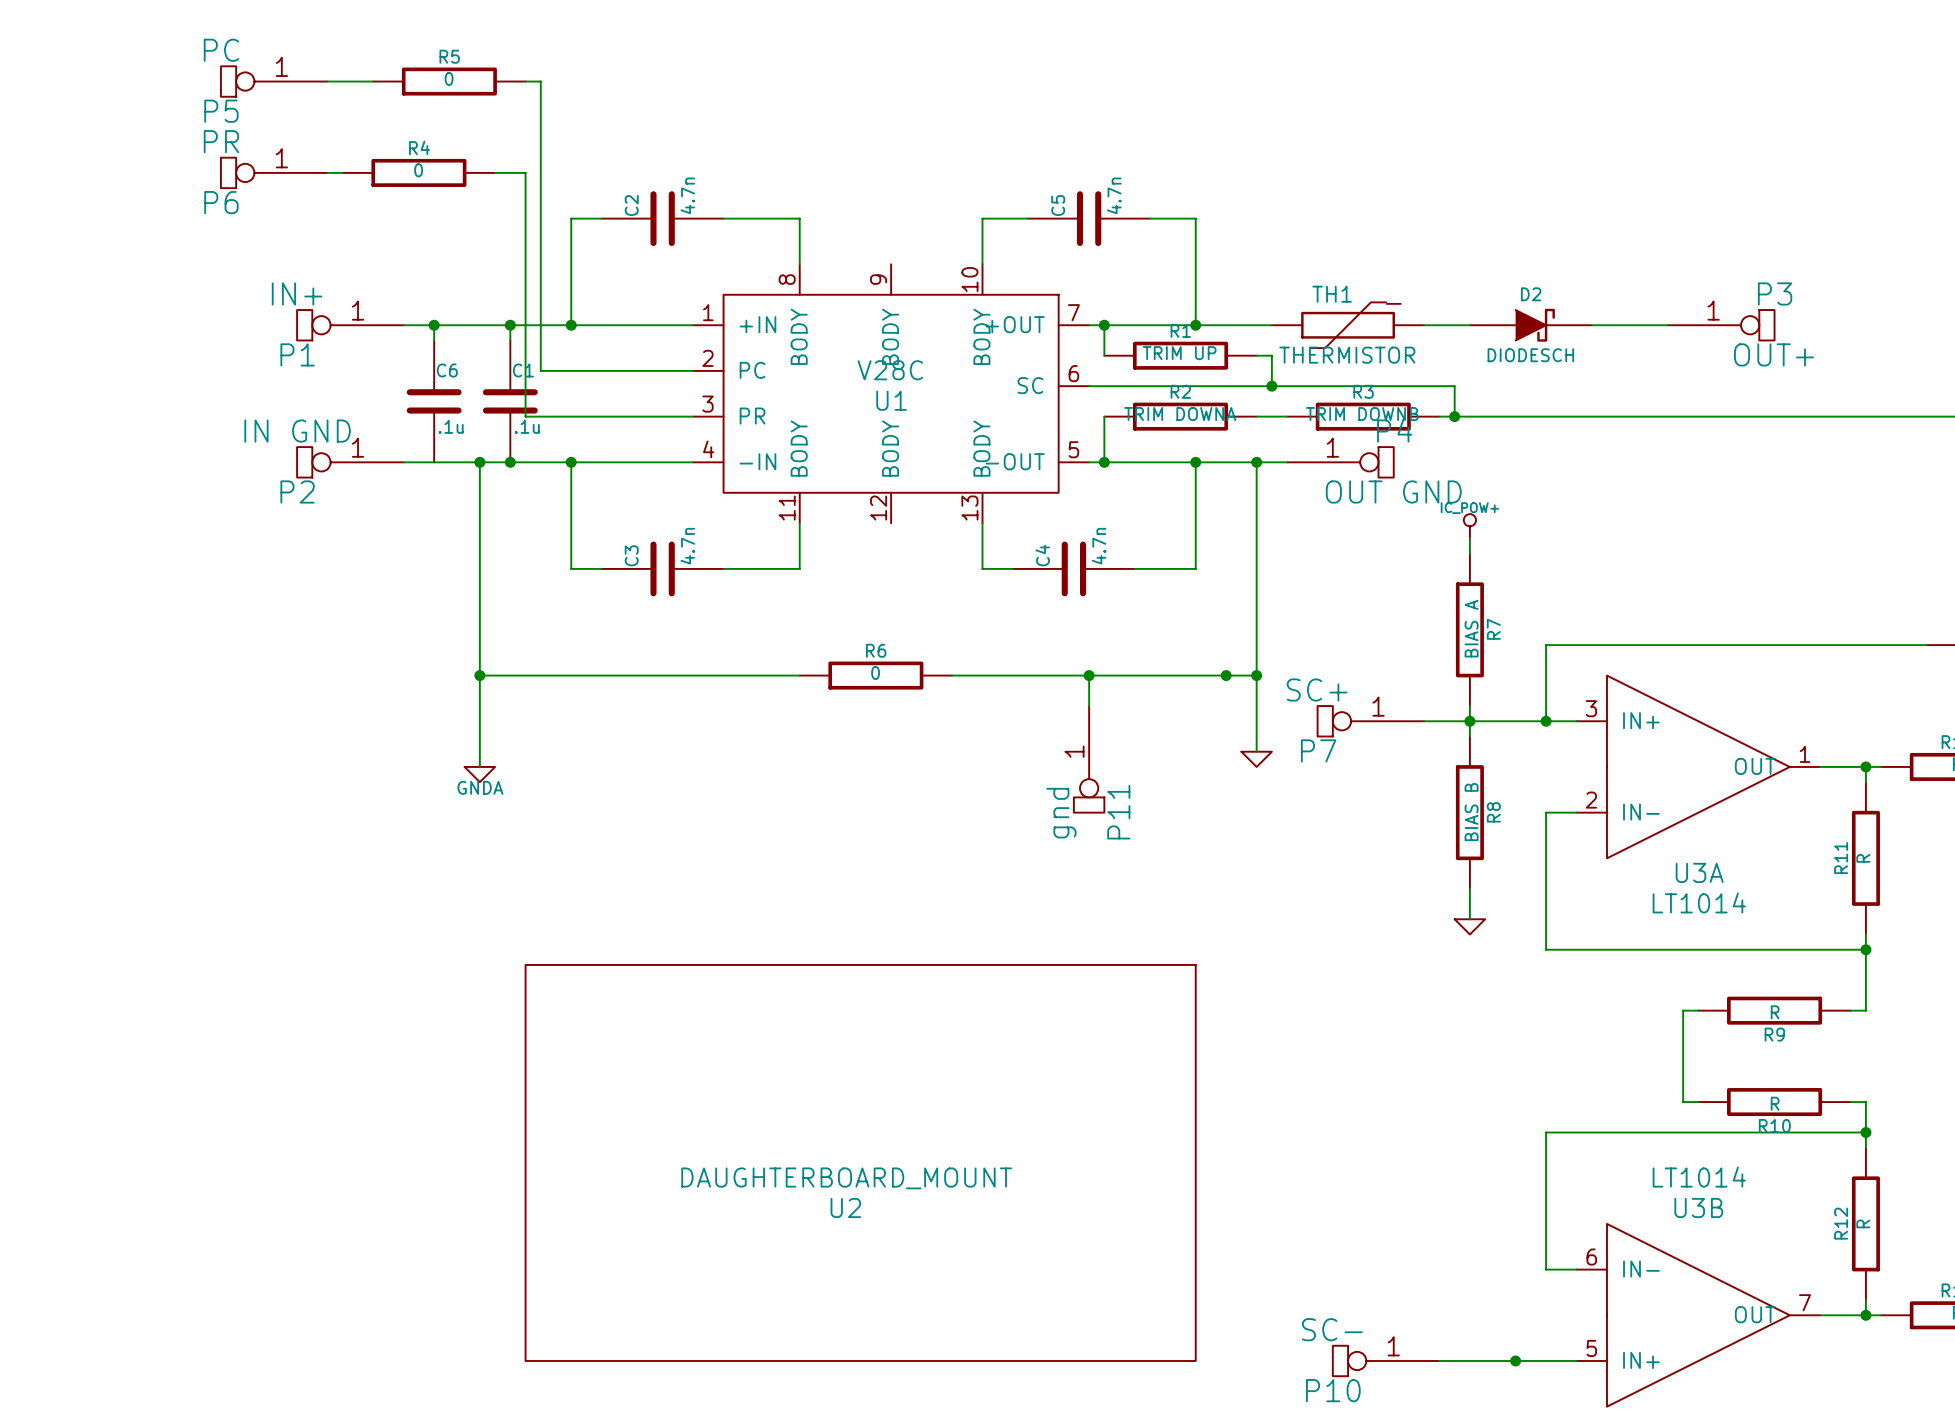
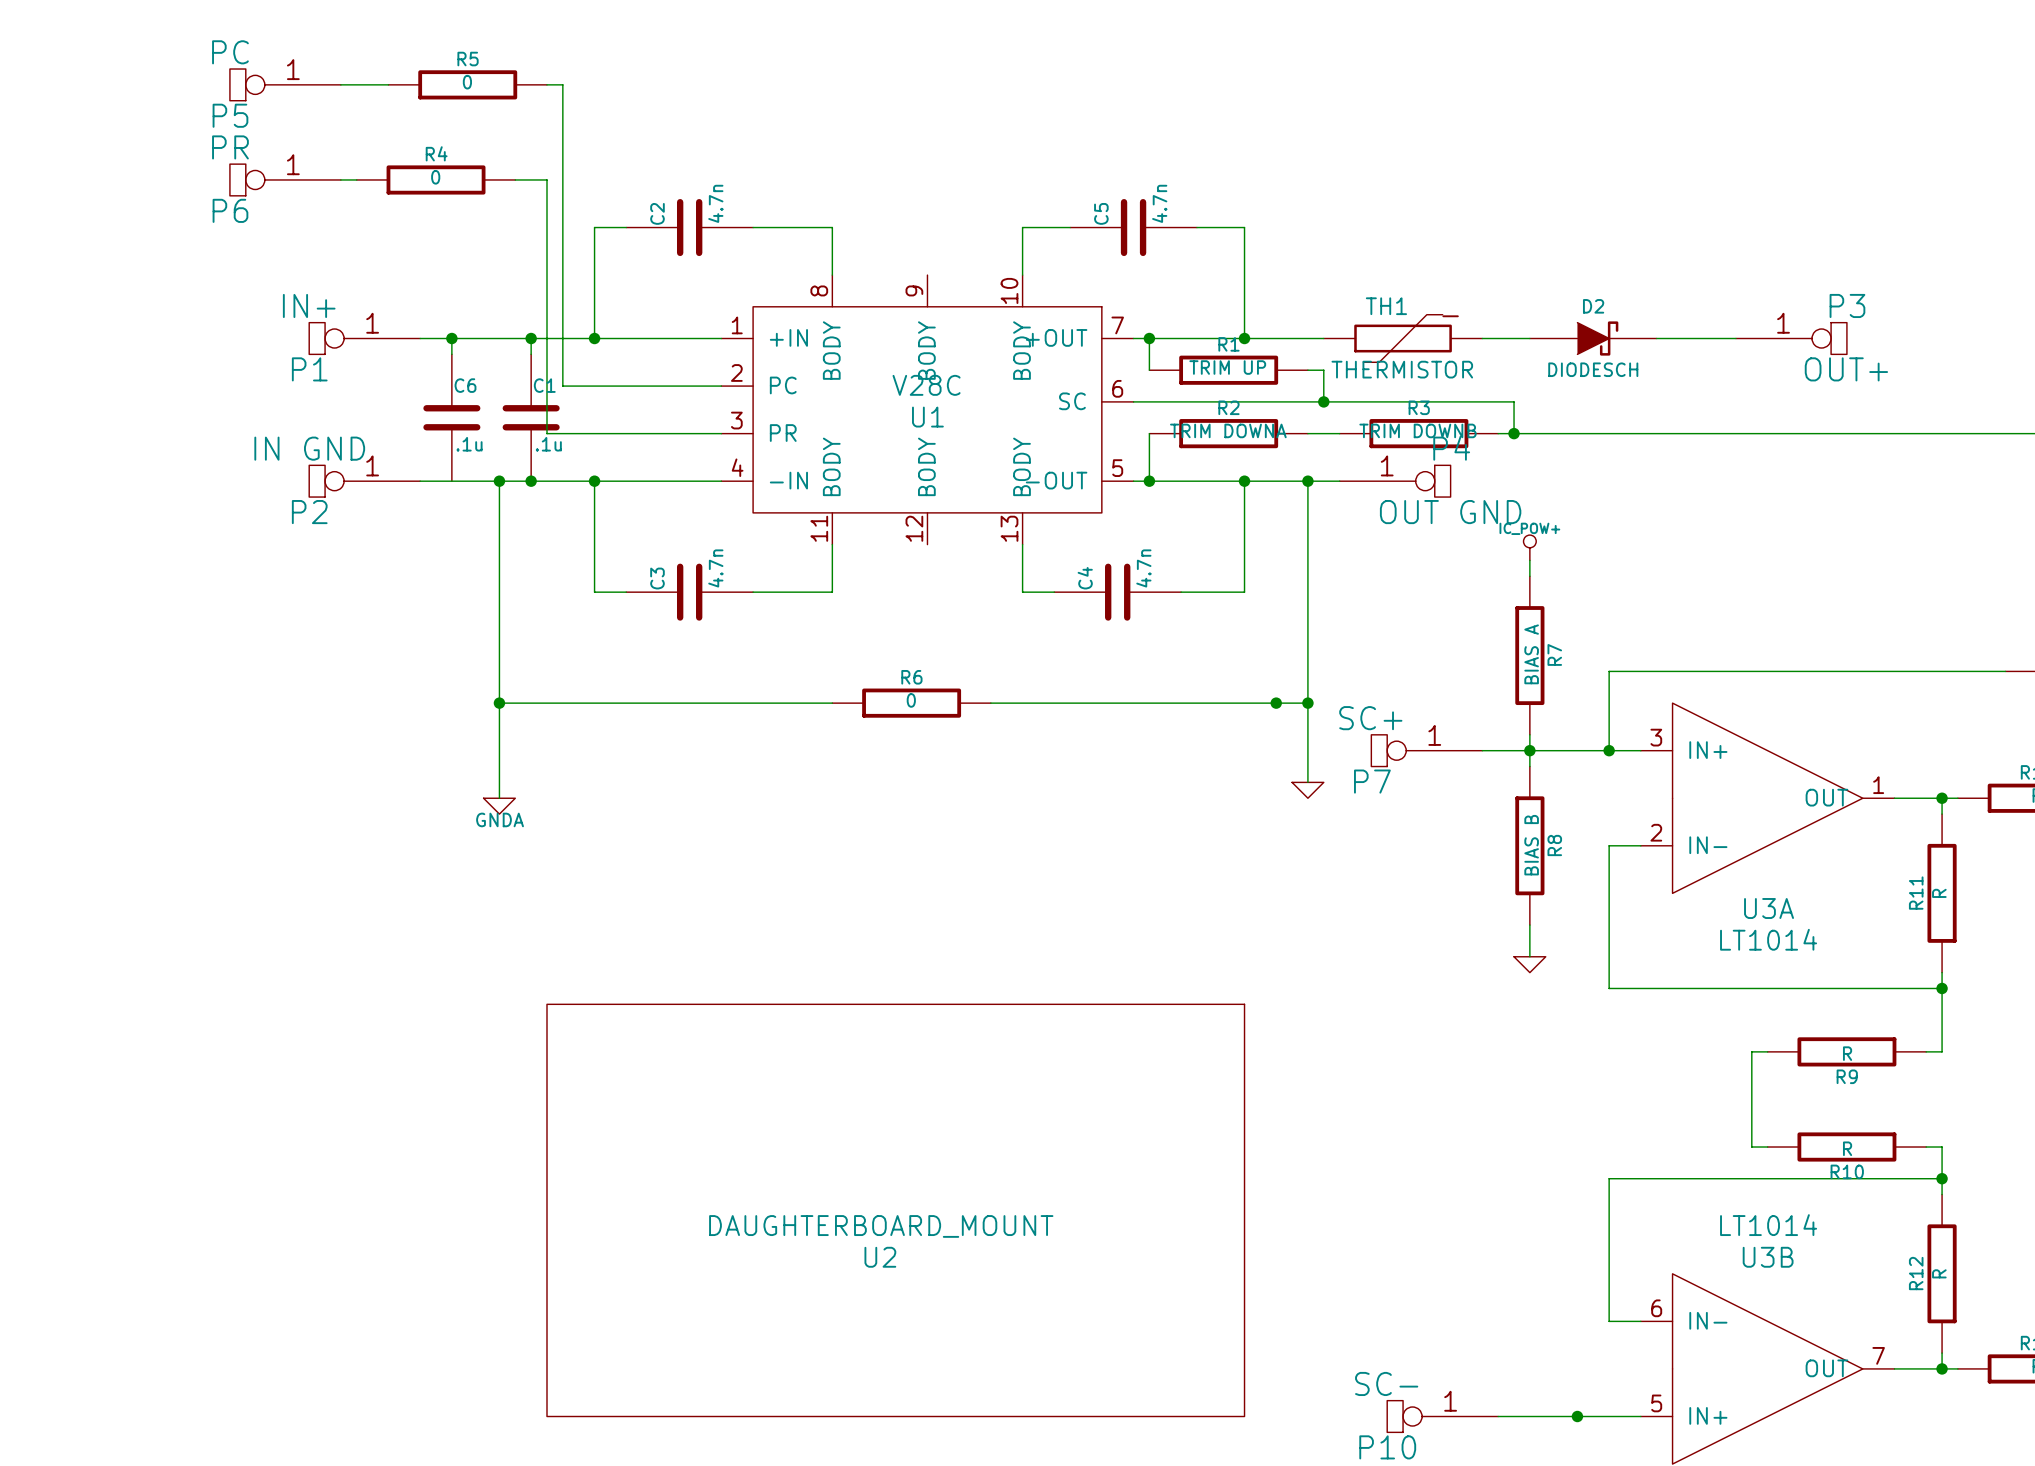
wire: (1089, 675) (1089, 706) -> none
junction: (1089, 675) -> none
P11: gnd (1089, 759) -> none

